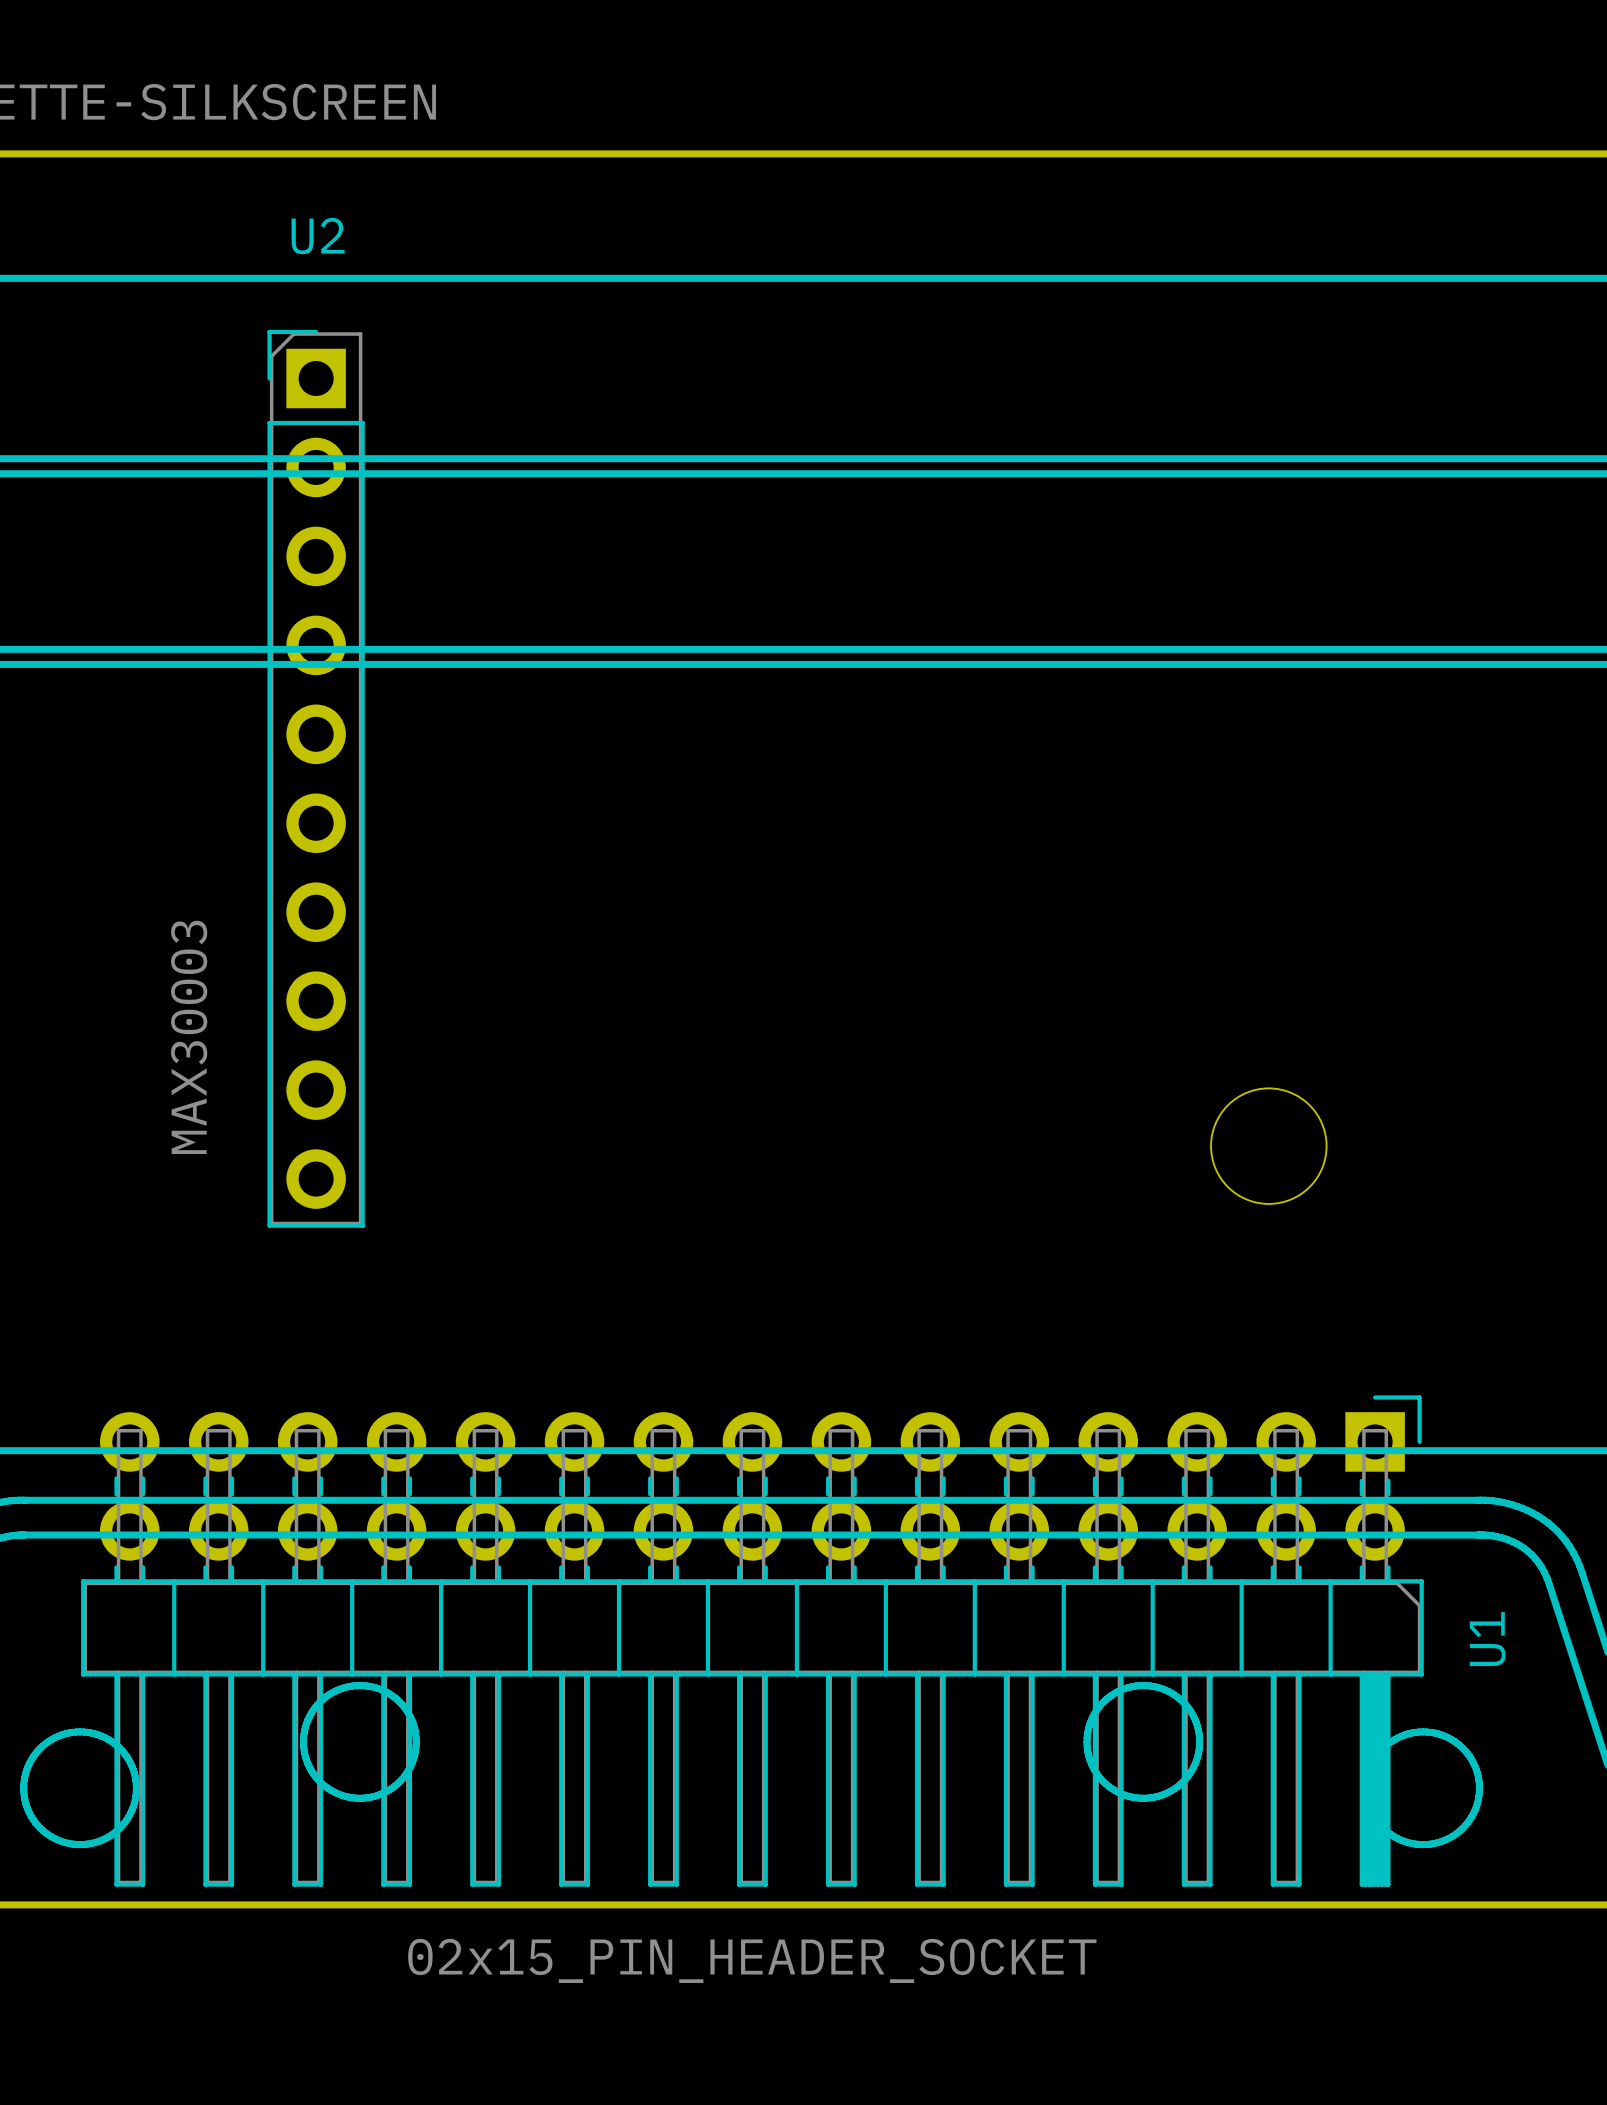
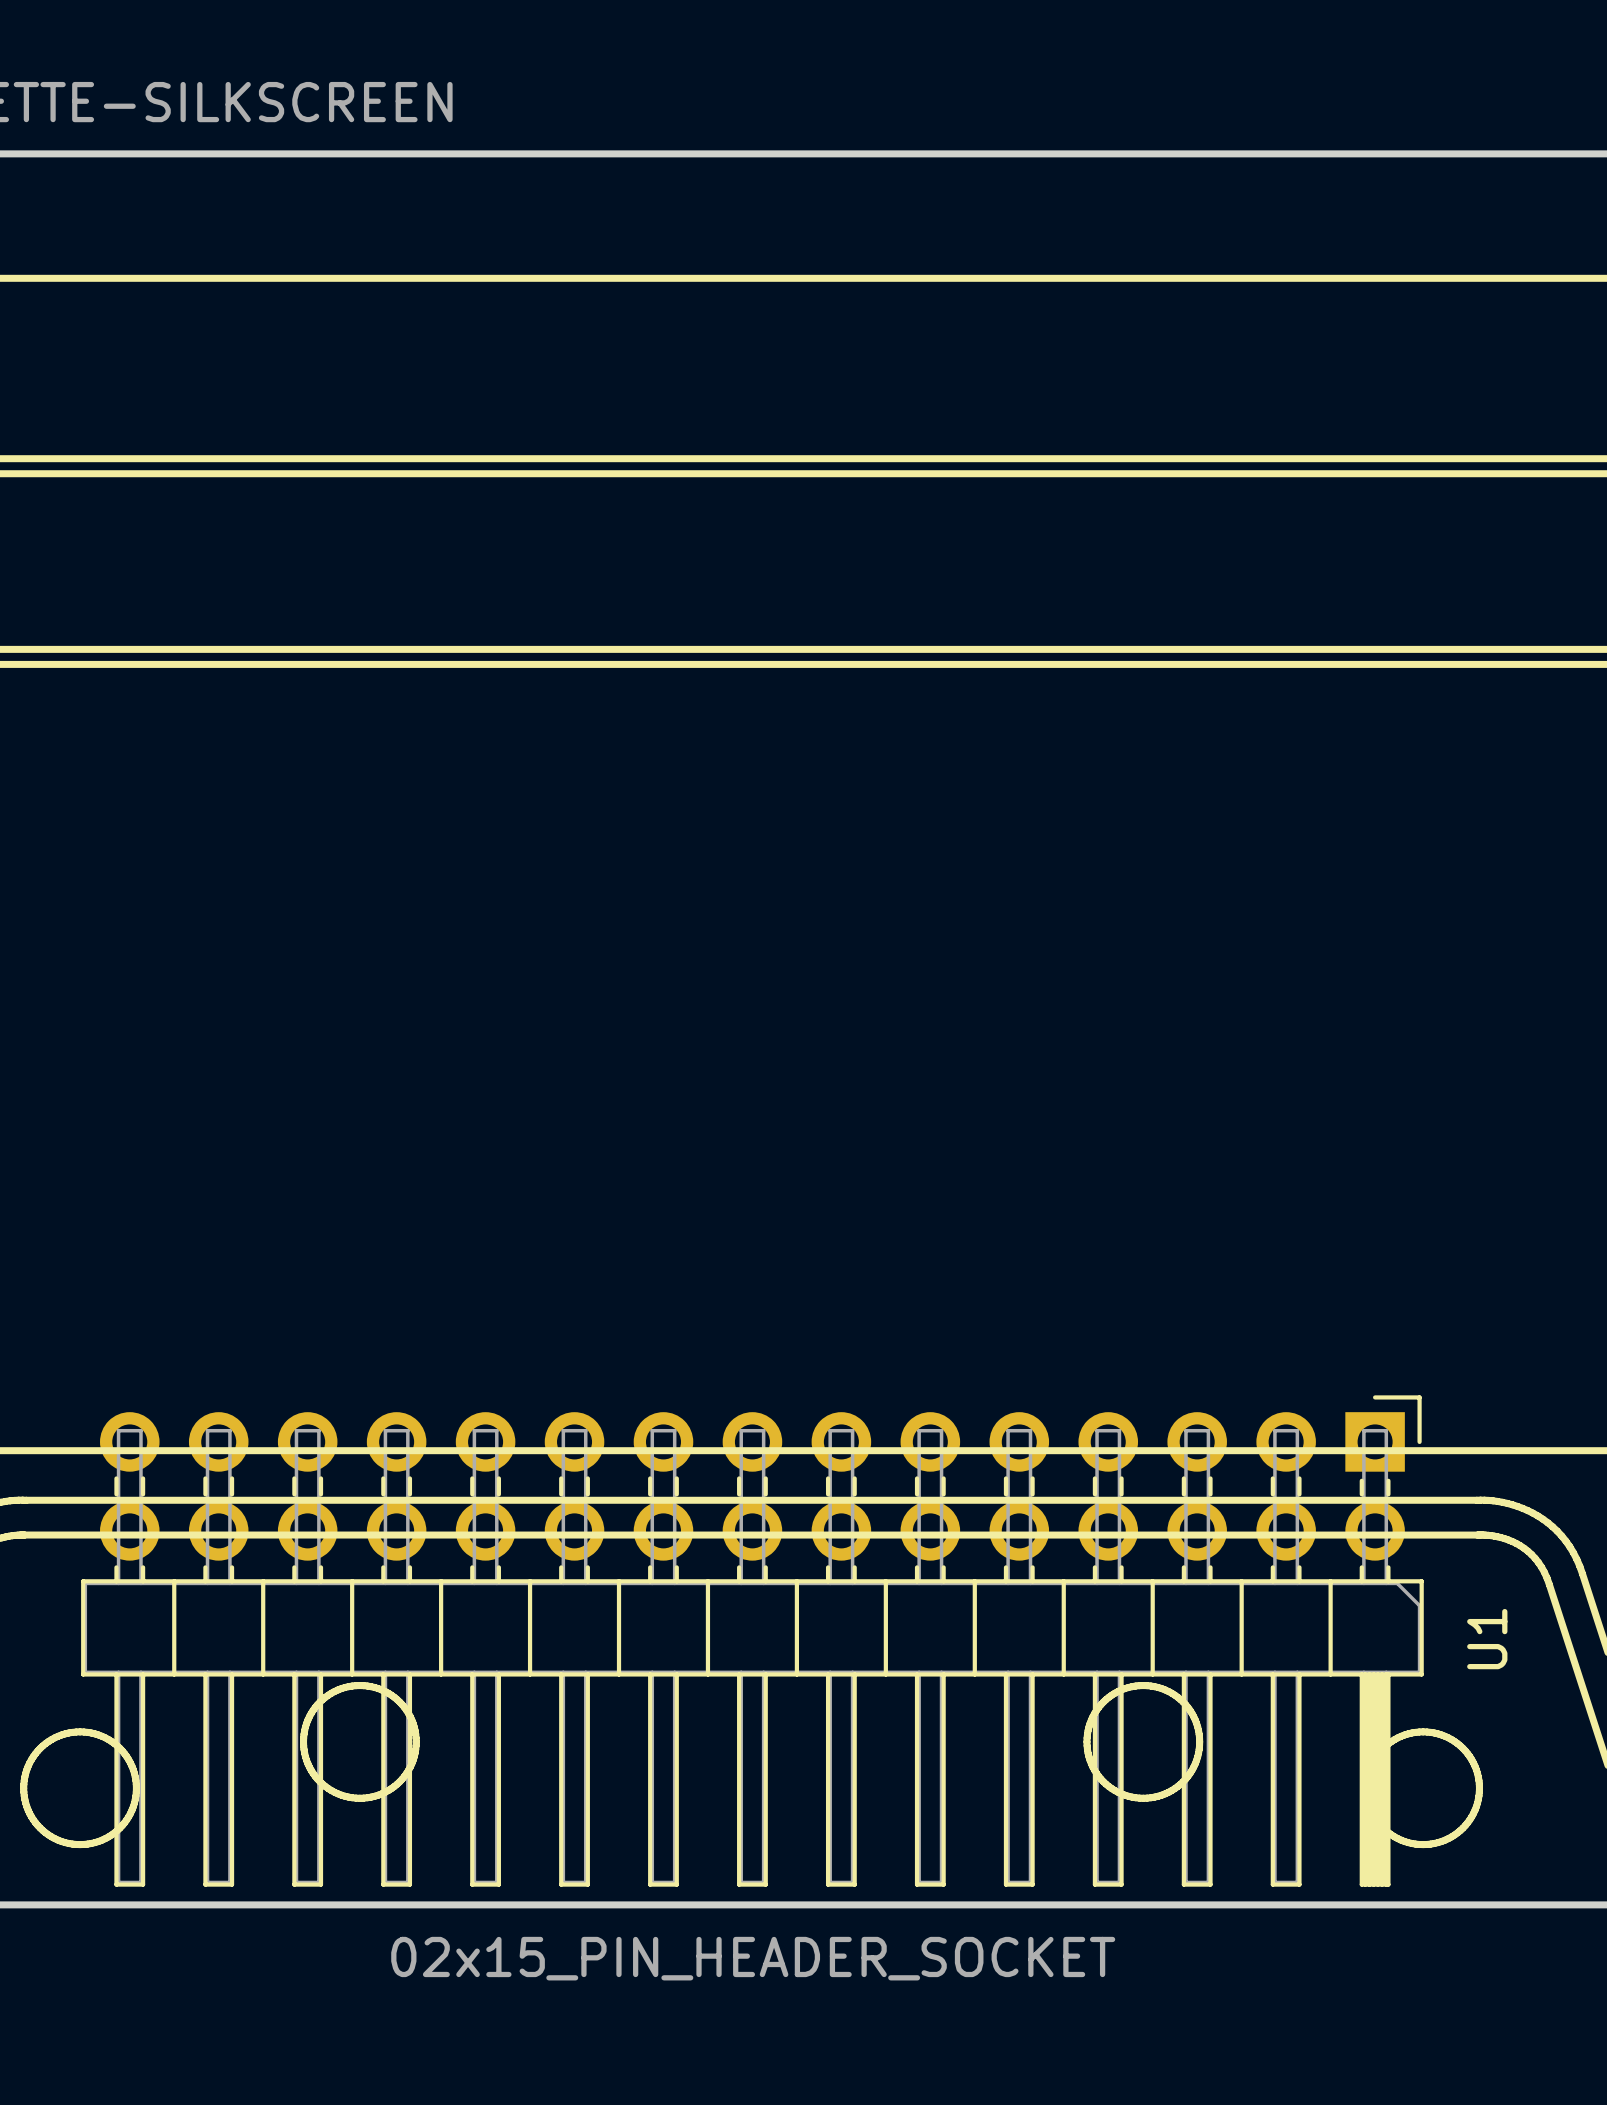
U2: MAX30003 (797, 778) -> none

